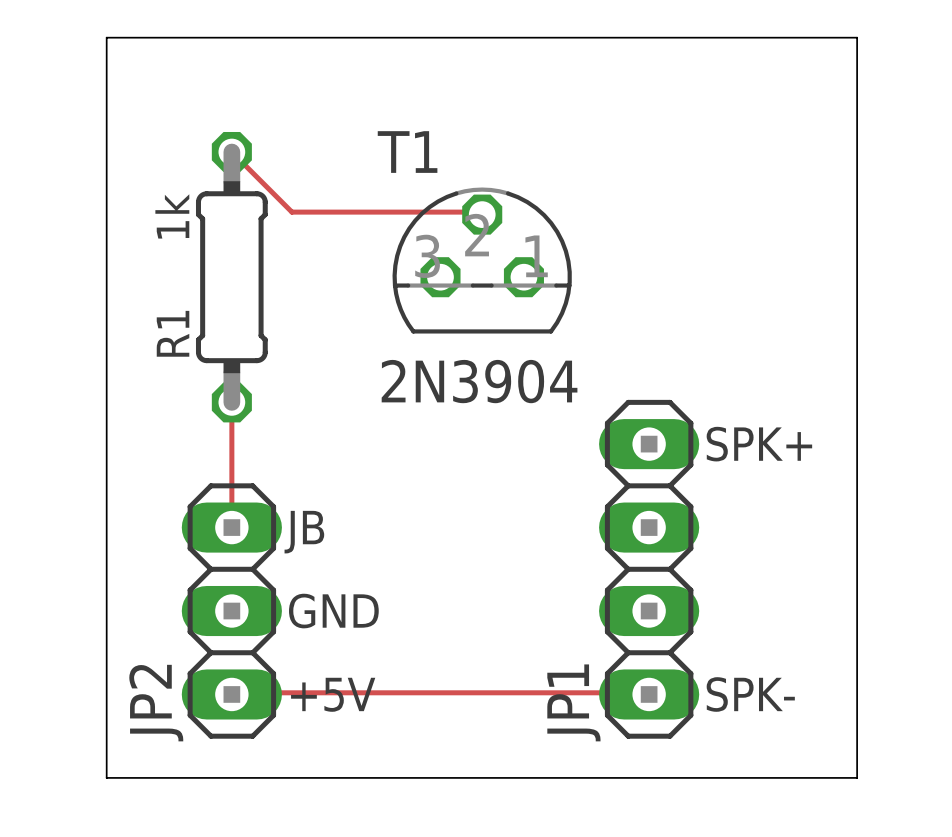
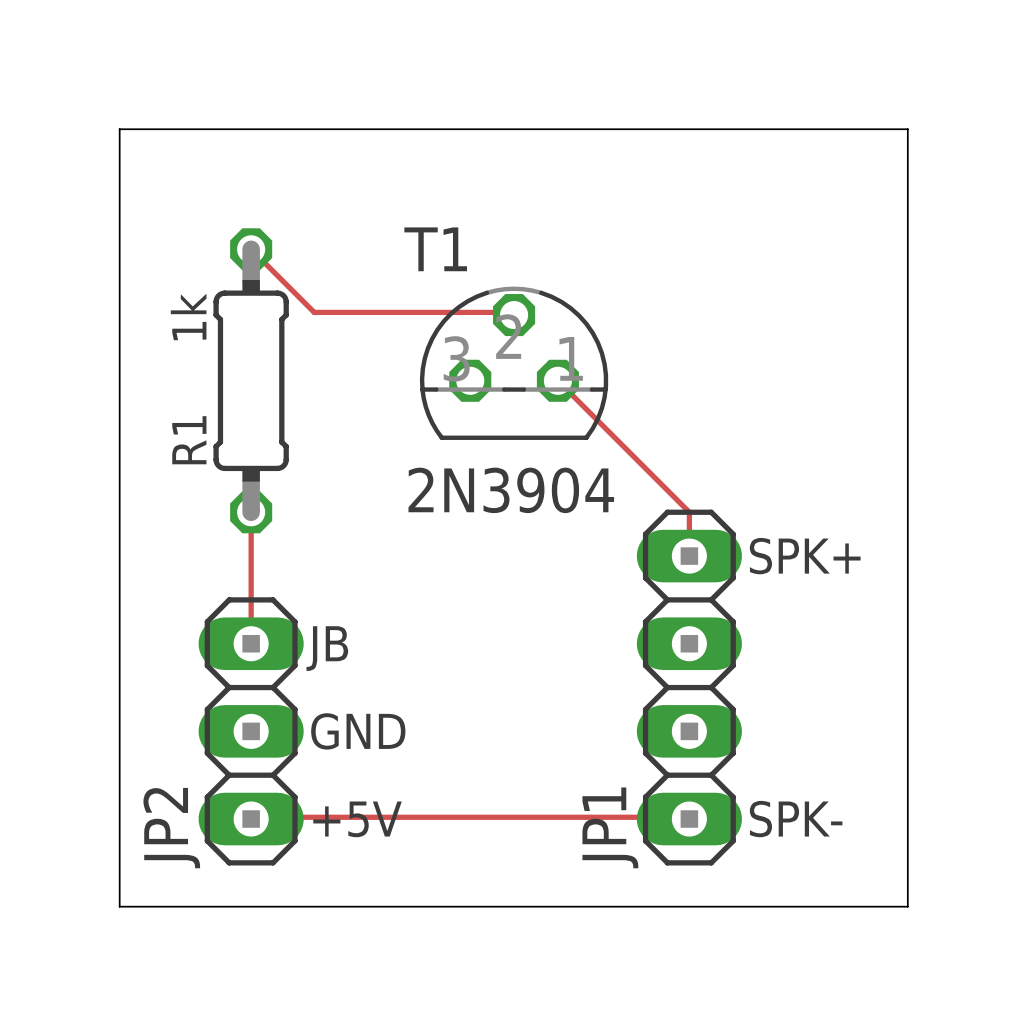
track: none -> (557, 380) (689, 512) (689, 556)

